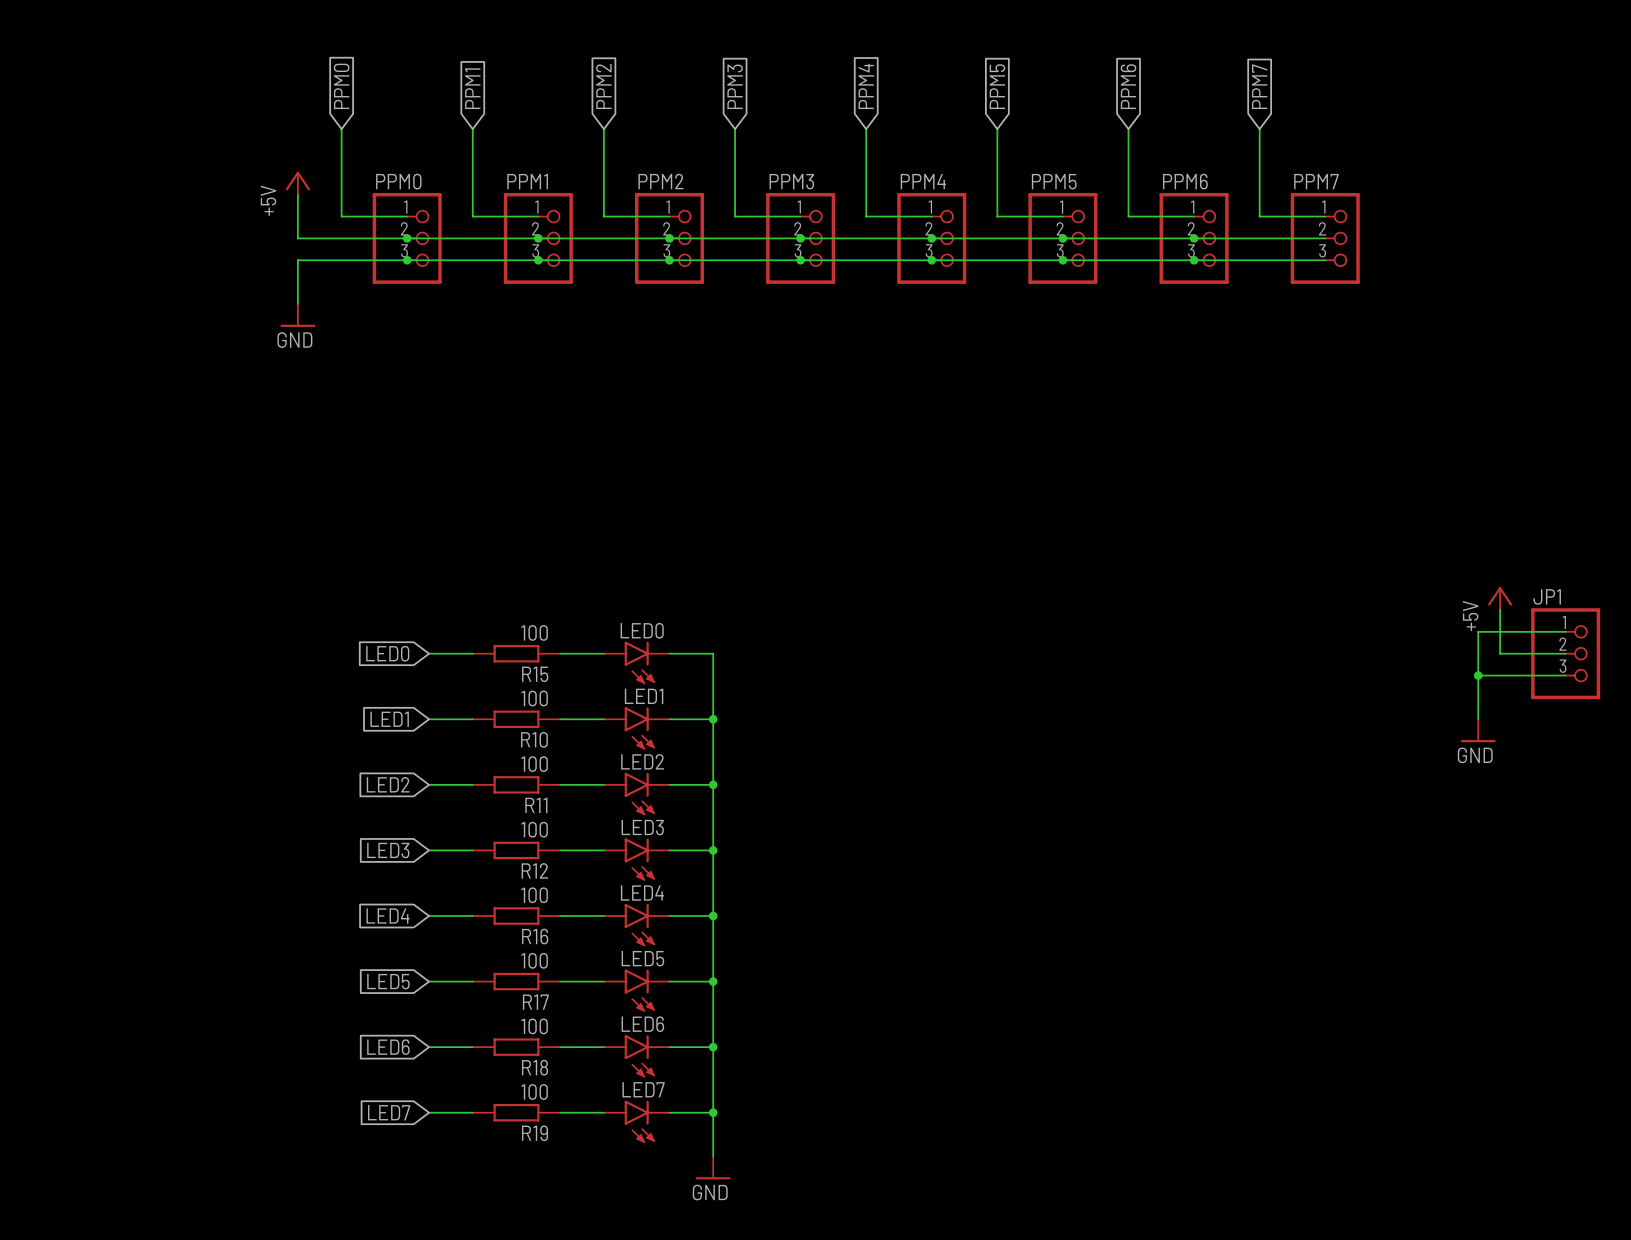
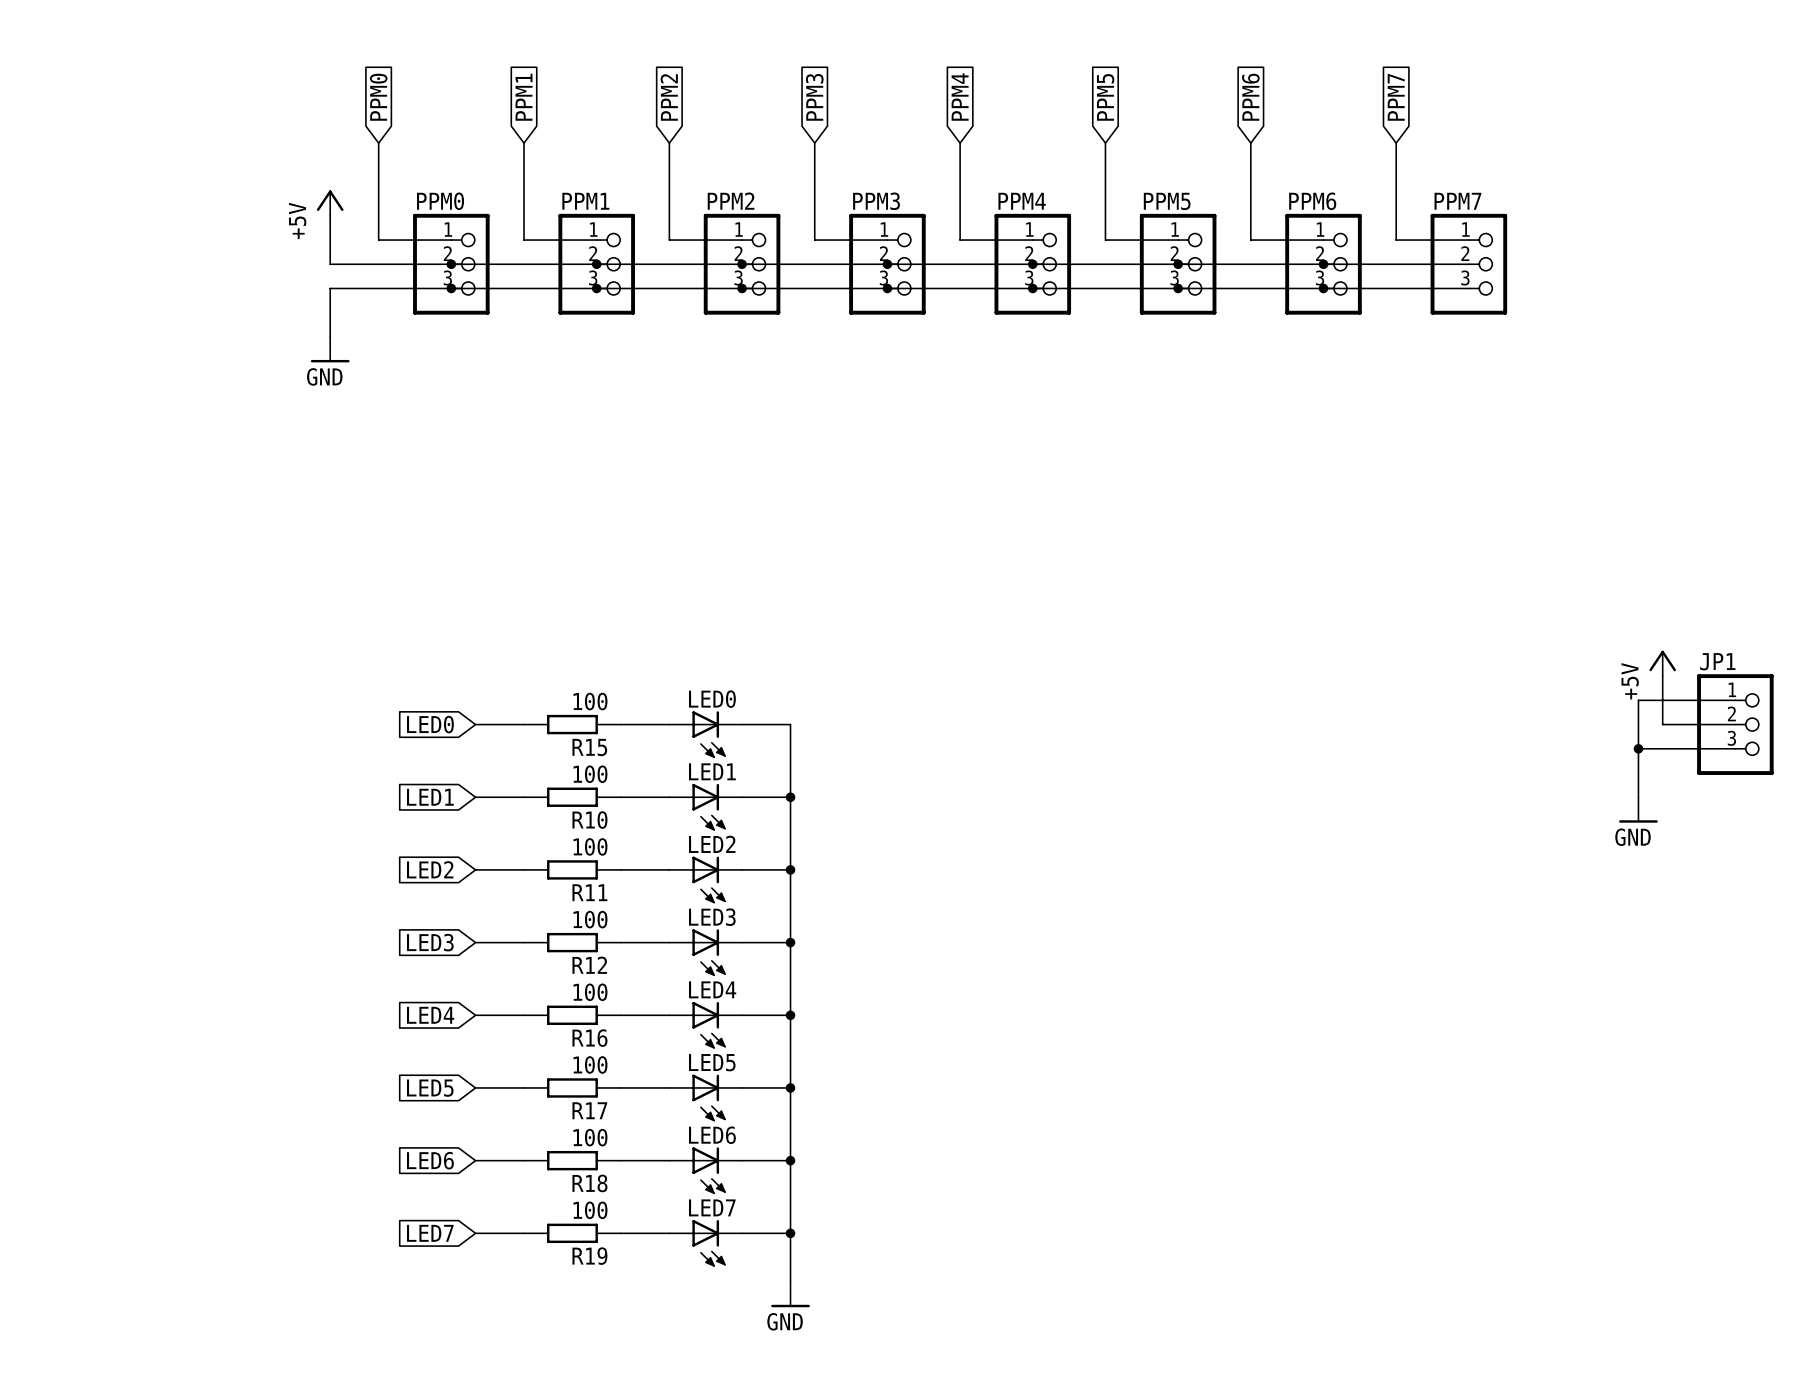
LED0 symbol: [603, 641, 670, 684] -> [669, 711, 743, 759]
LED1 symbol: [603, 707, 670, 750] -> [669, 783, 743, 831]
LED2 symbol: [603, 772, 670, 816] -> [669, 856, 743, 904]
LED3 symbol: [603, 838, 670, 881] -> [669, 929, 743, 977]
LED4 symbol: [603, 903, 670, 947] -> [669, 1001, 743, 1049]
LED5 symbol: [603, 969, 670, 1012] -> [669, 1074, 743, 1122]
LED6 symbol: [603, 1035, 670, 1078] -> [669, 1147, 743, 1195]
LED7 symbol: [603, 1100, 670, 1143] -> [669, 1220, 743, 1267]

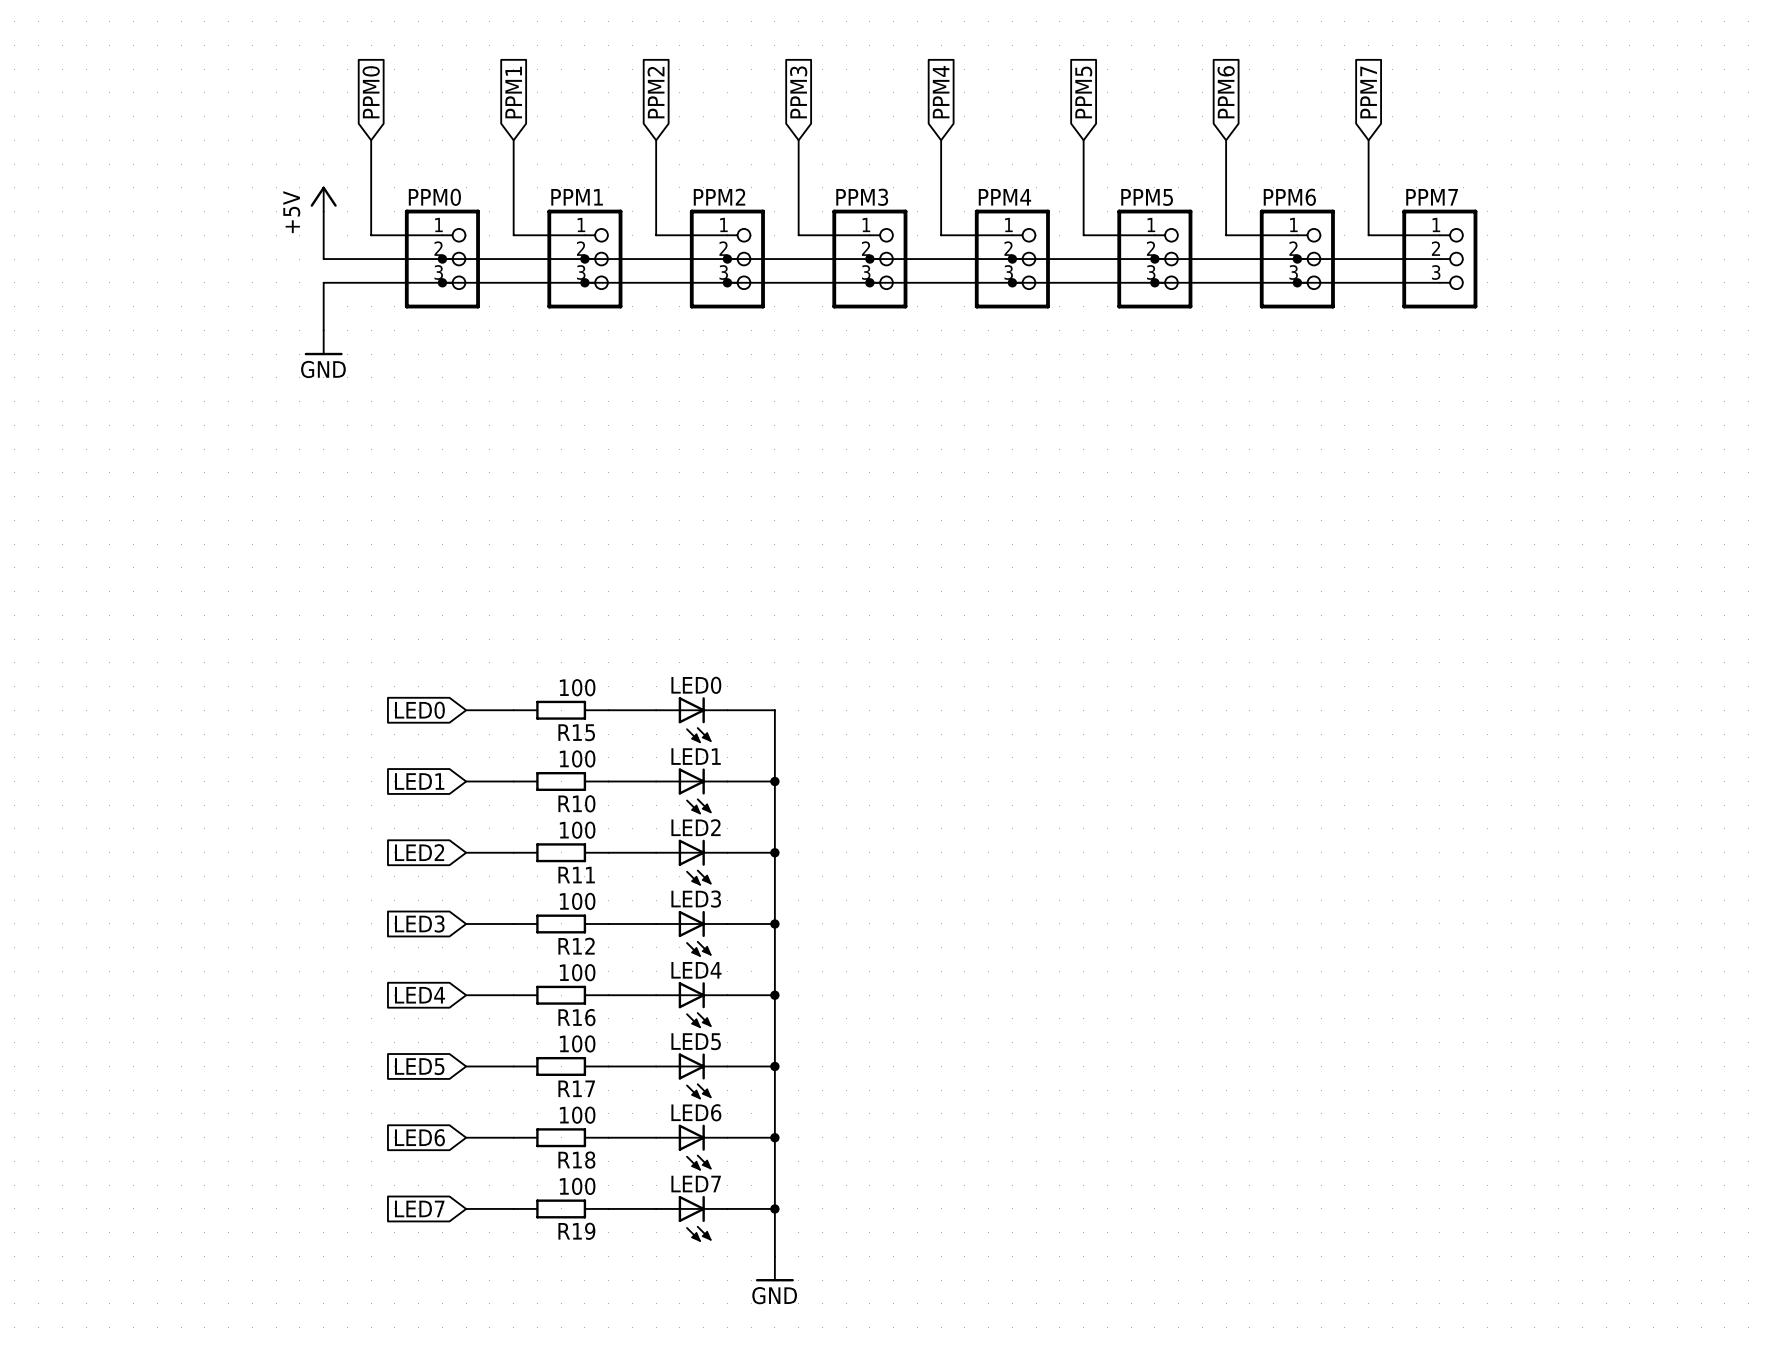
power symbol: +5V (1662, 663) -> none
wire: (1662, 676) (1662, 724) (1735, 724) -> none
wire: (1735, 700) (1638, 700) (1638, 797) -> none
JP1: (1735, 724) -> none
wire: (1638, 748) (1735, 748) -> none
junction: (1638, 748) -> none
power symbol: GND (1638, 809) -> none

